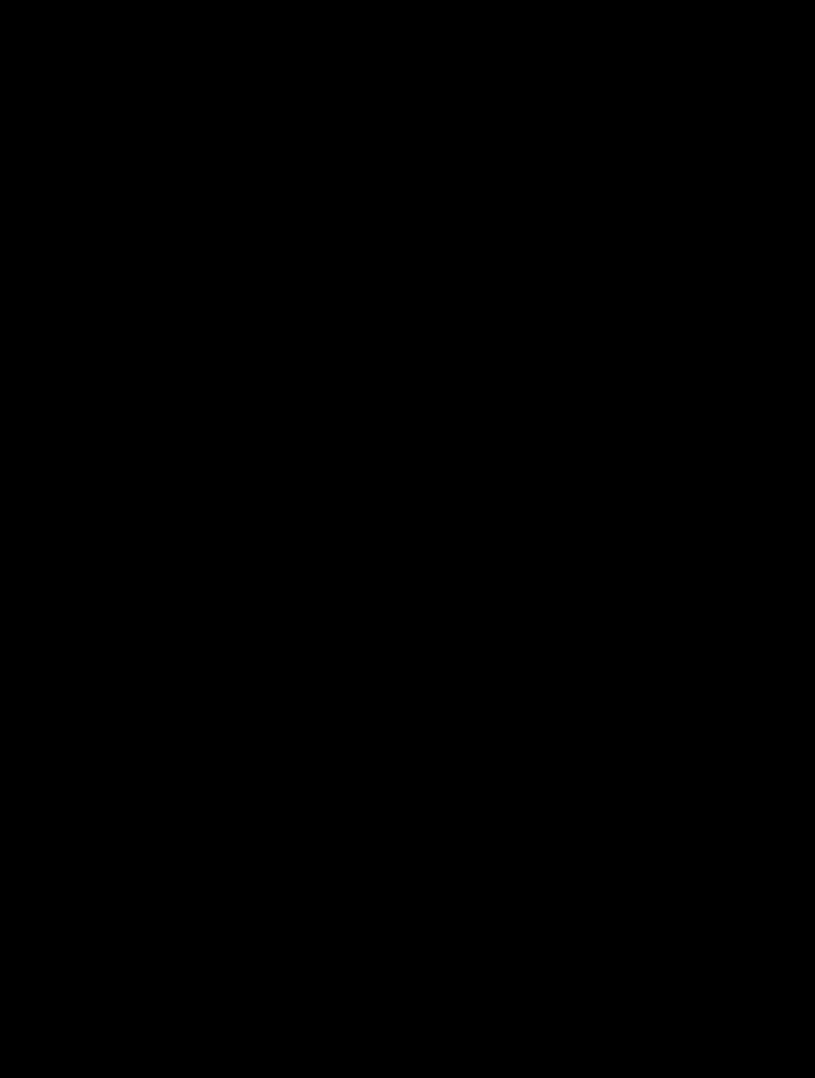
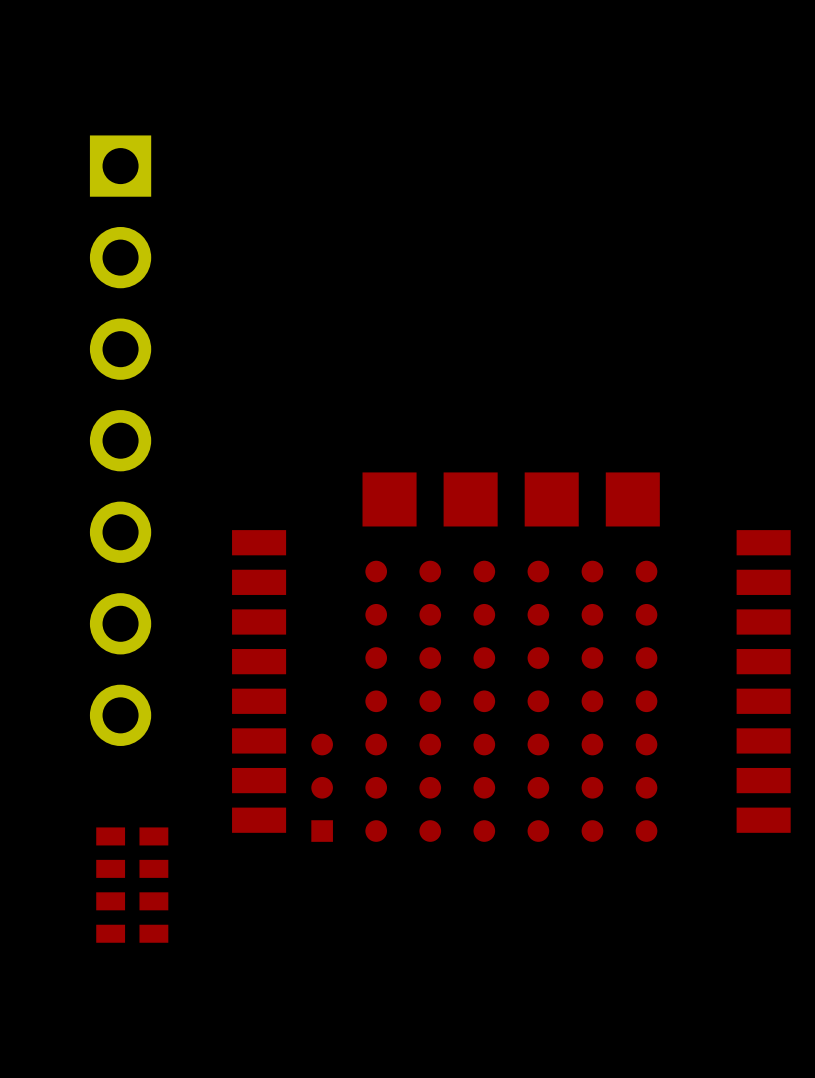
part: none -> (120, 440)
part: none -> (511, 657)
part: none -> (132, 885)

